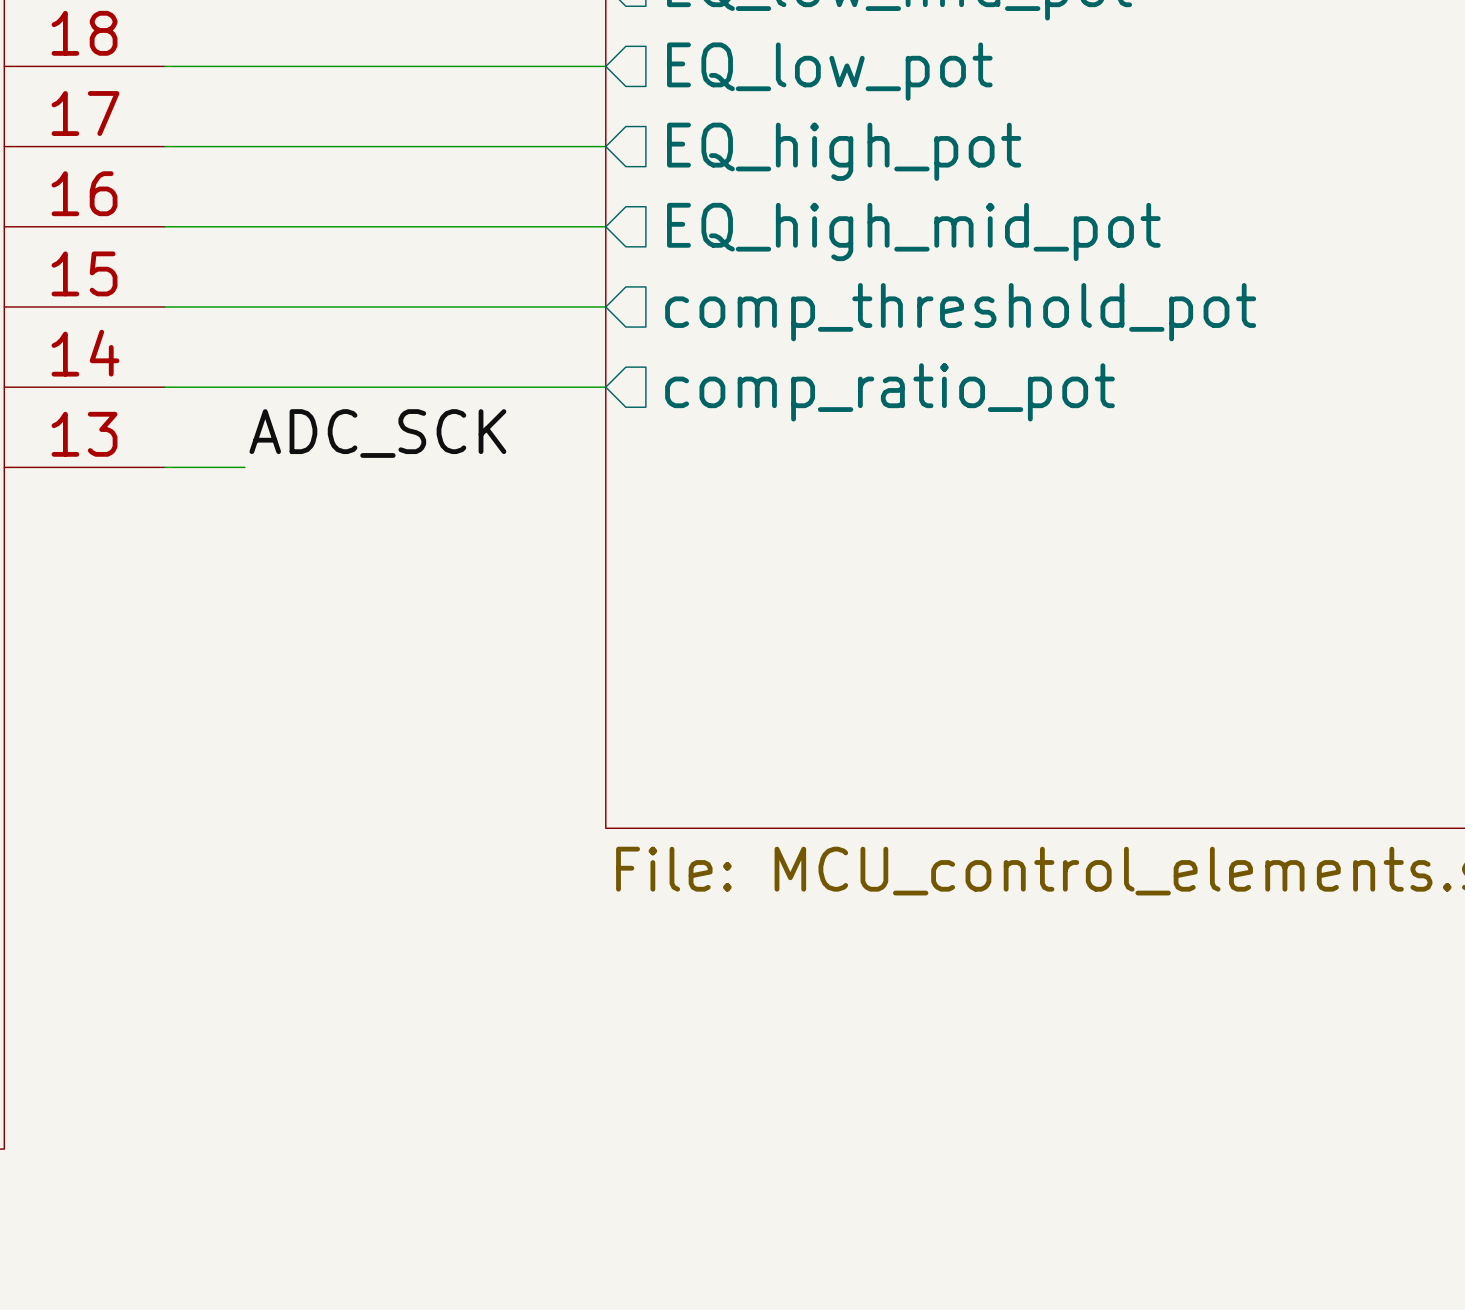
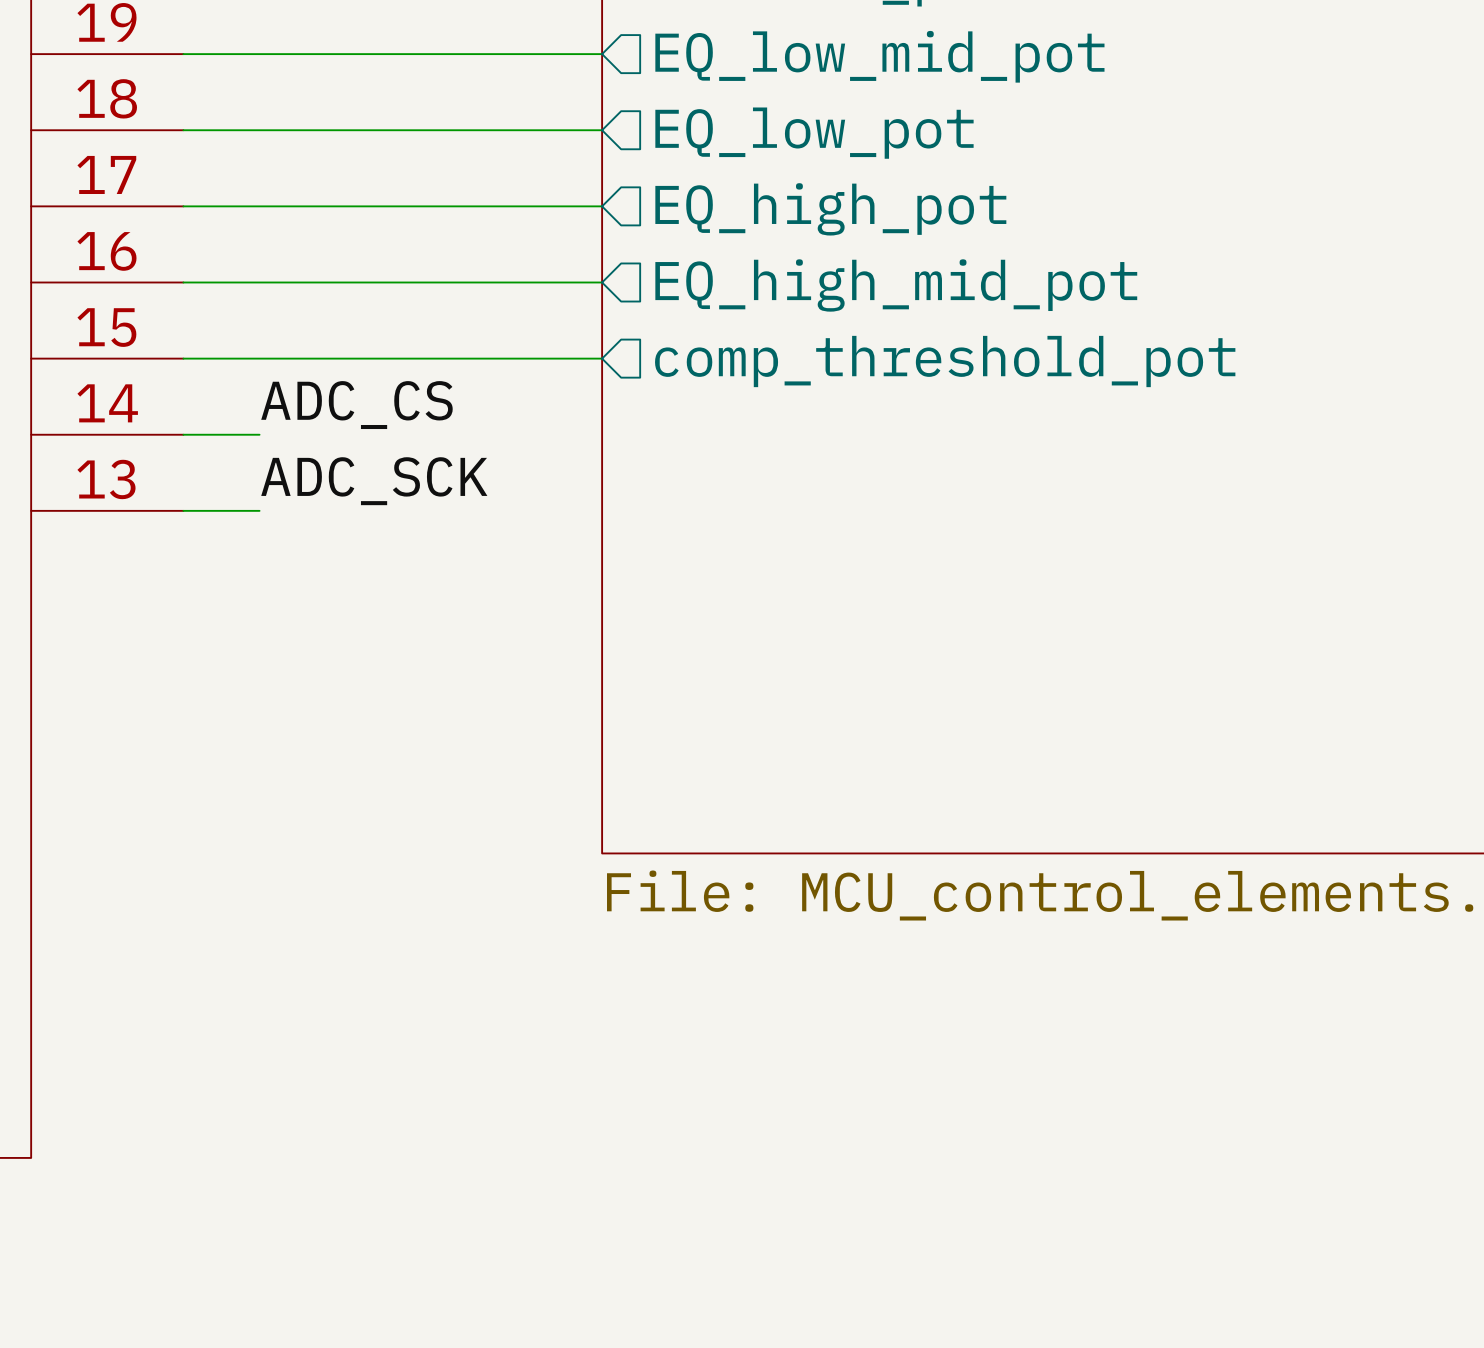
label: none -> ADC_CS (356, 405)
wire: (244, 387) (605, 387) -> none
sheet pin: comp_ratio_pot (889, 392) -> none

